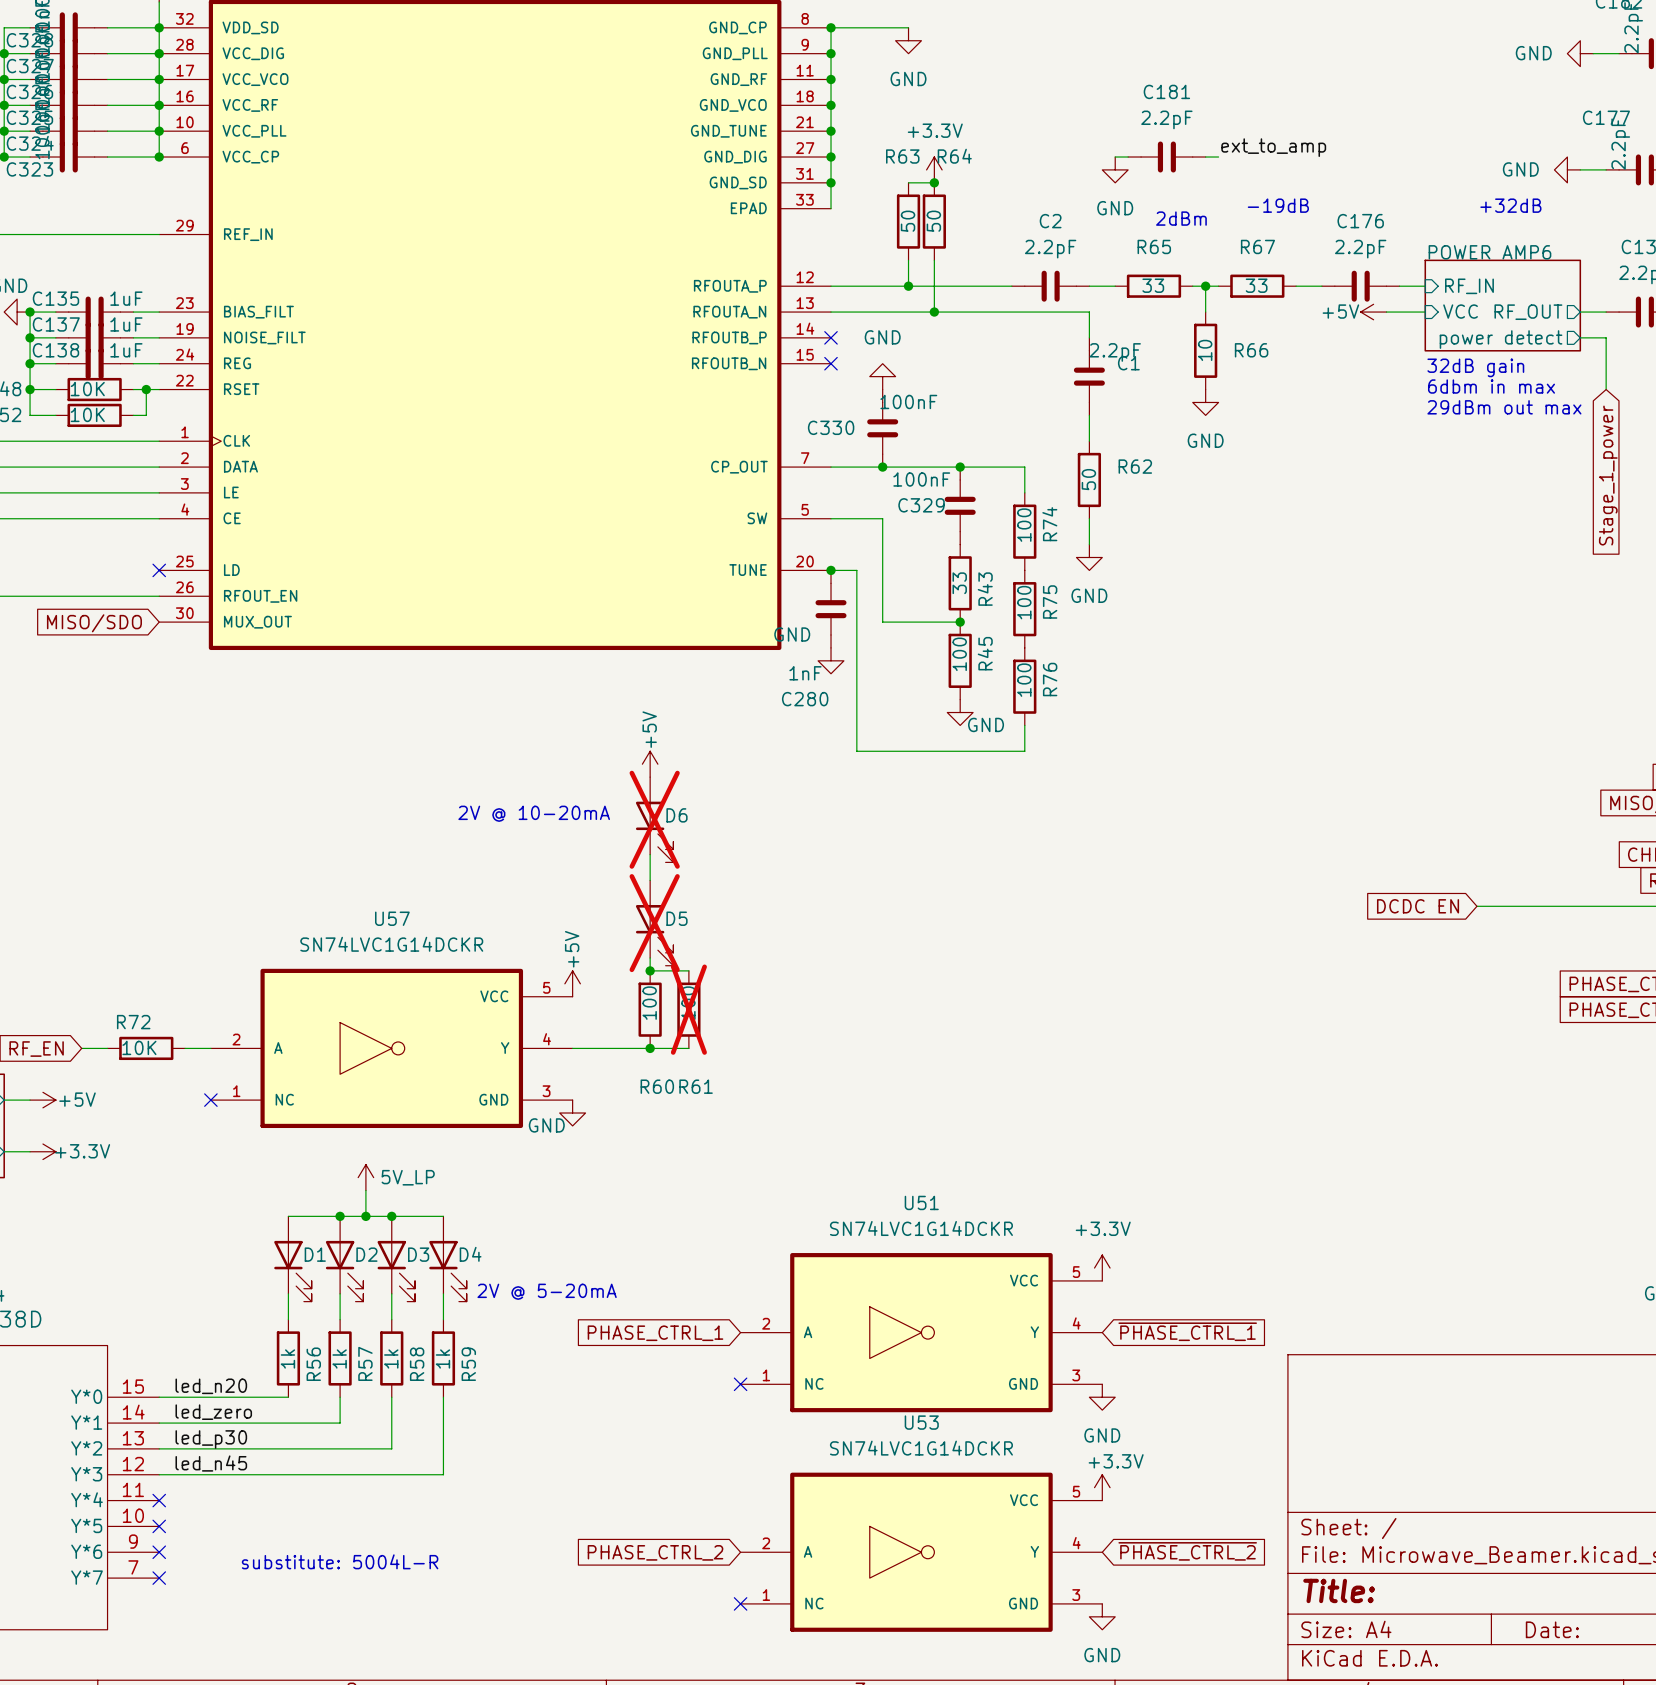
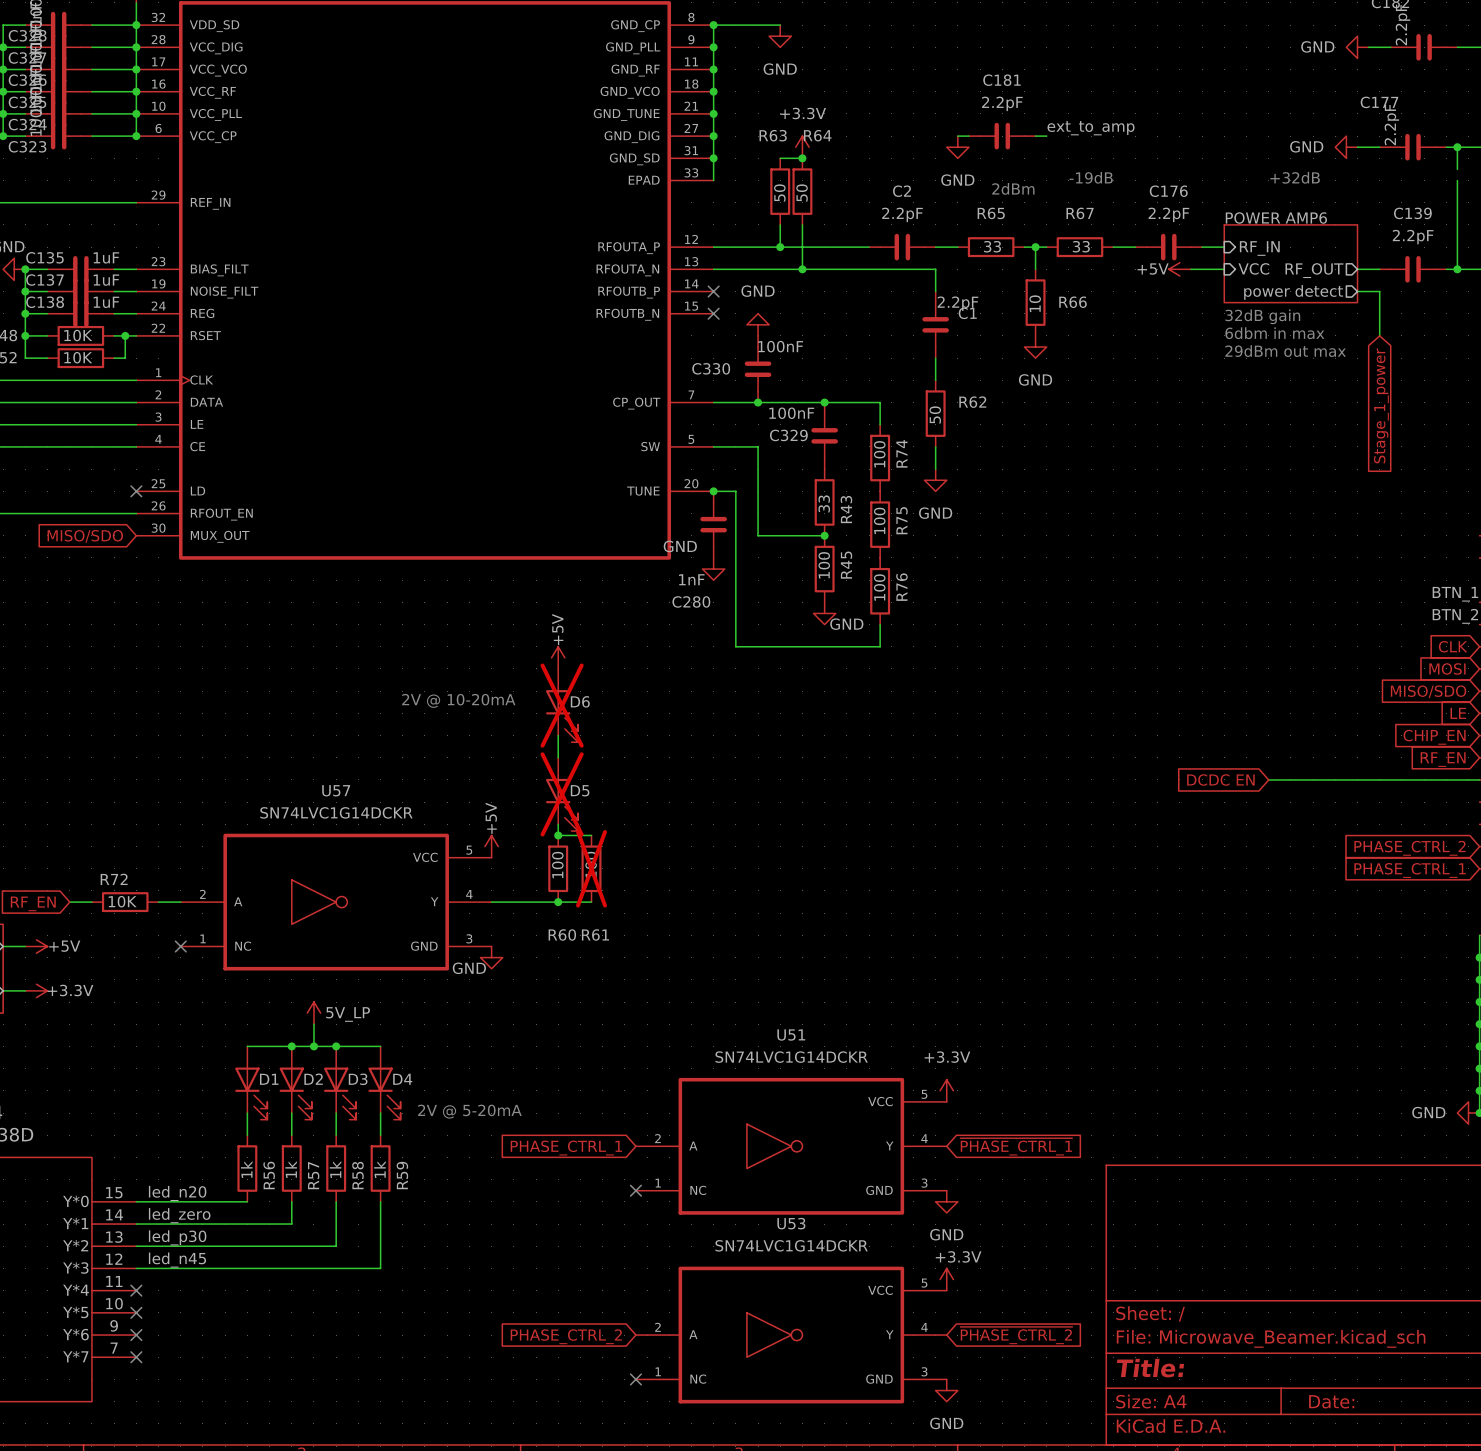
text: substitute: 5004L-R (340, 1561) -> none

